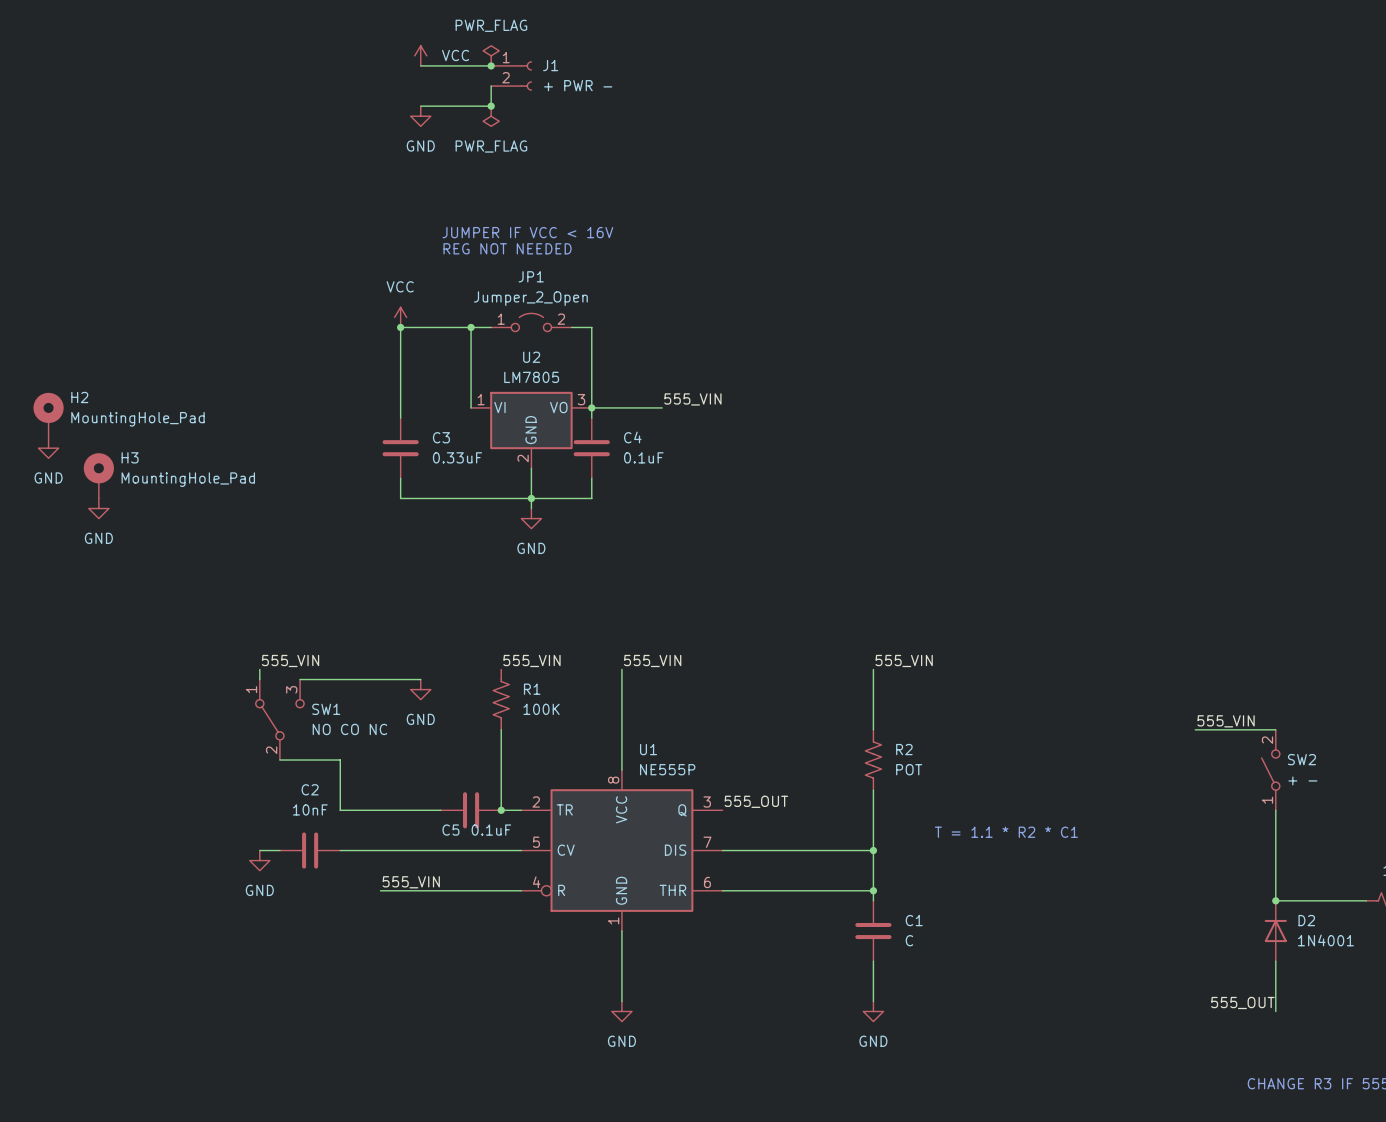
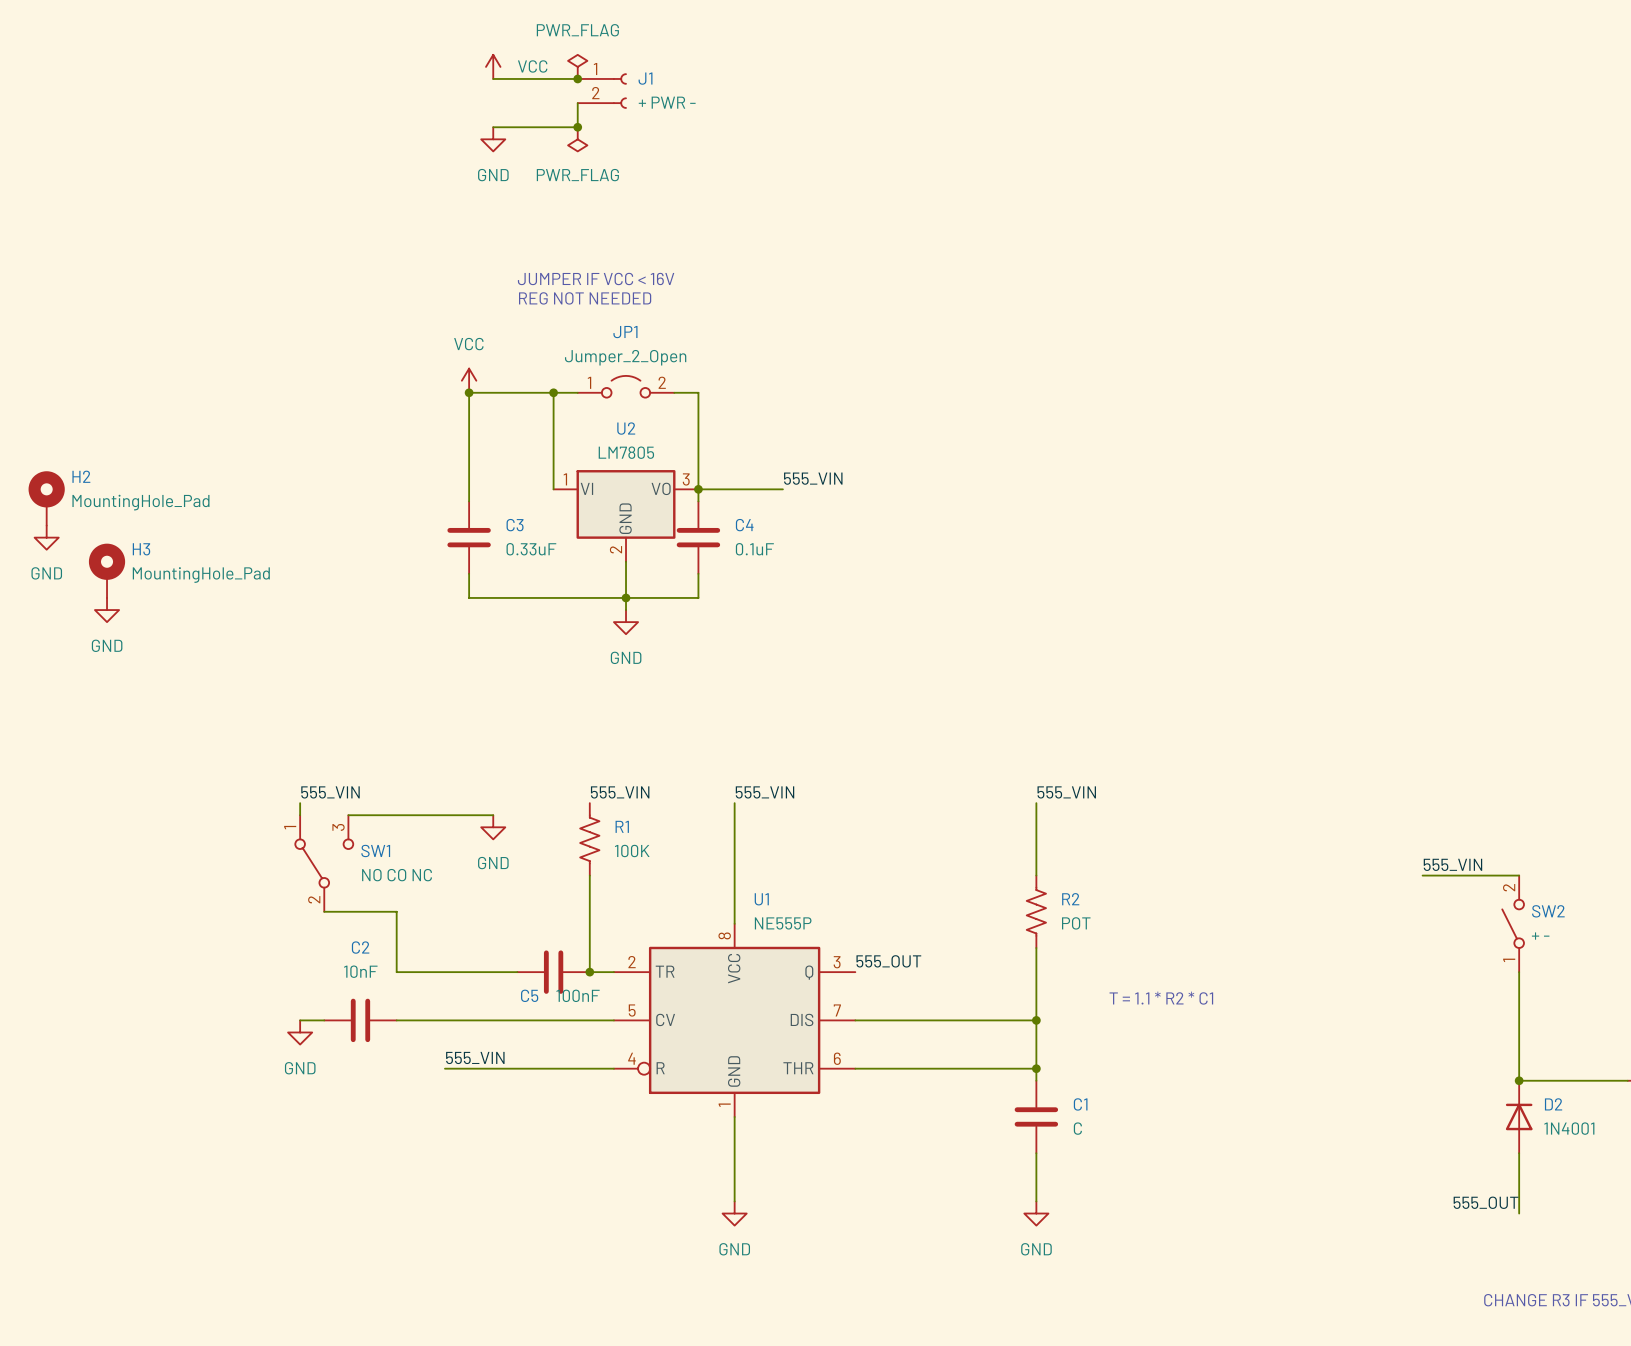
C5 value: 0.1uF (491, 830) -> 100nF (578, 995)

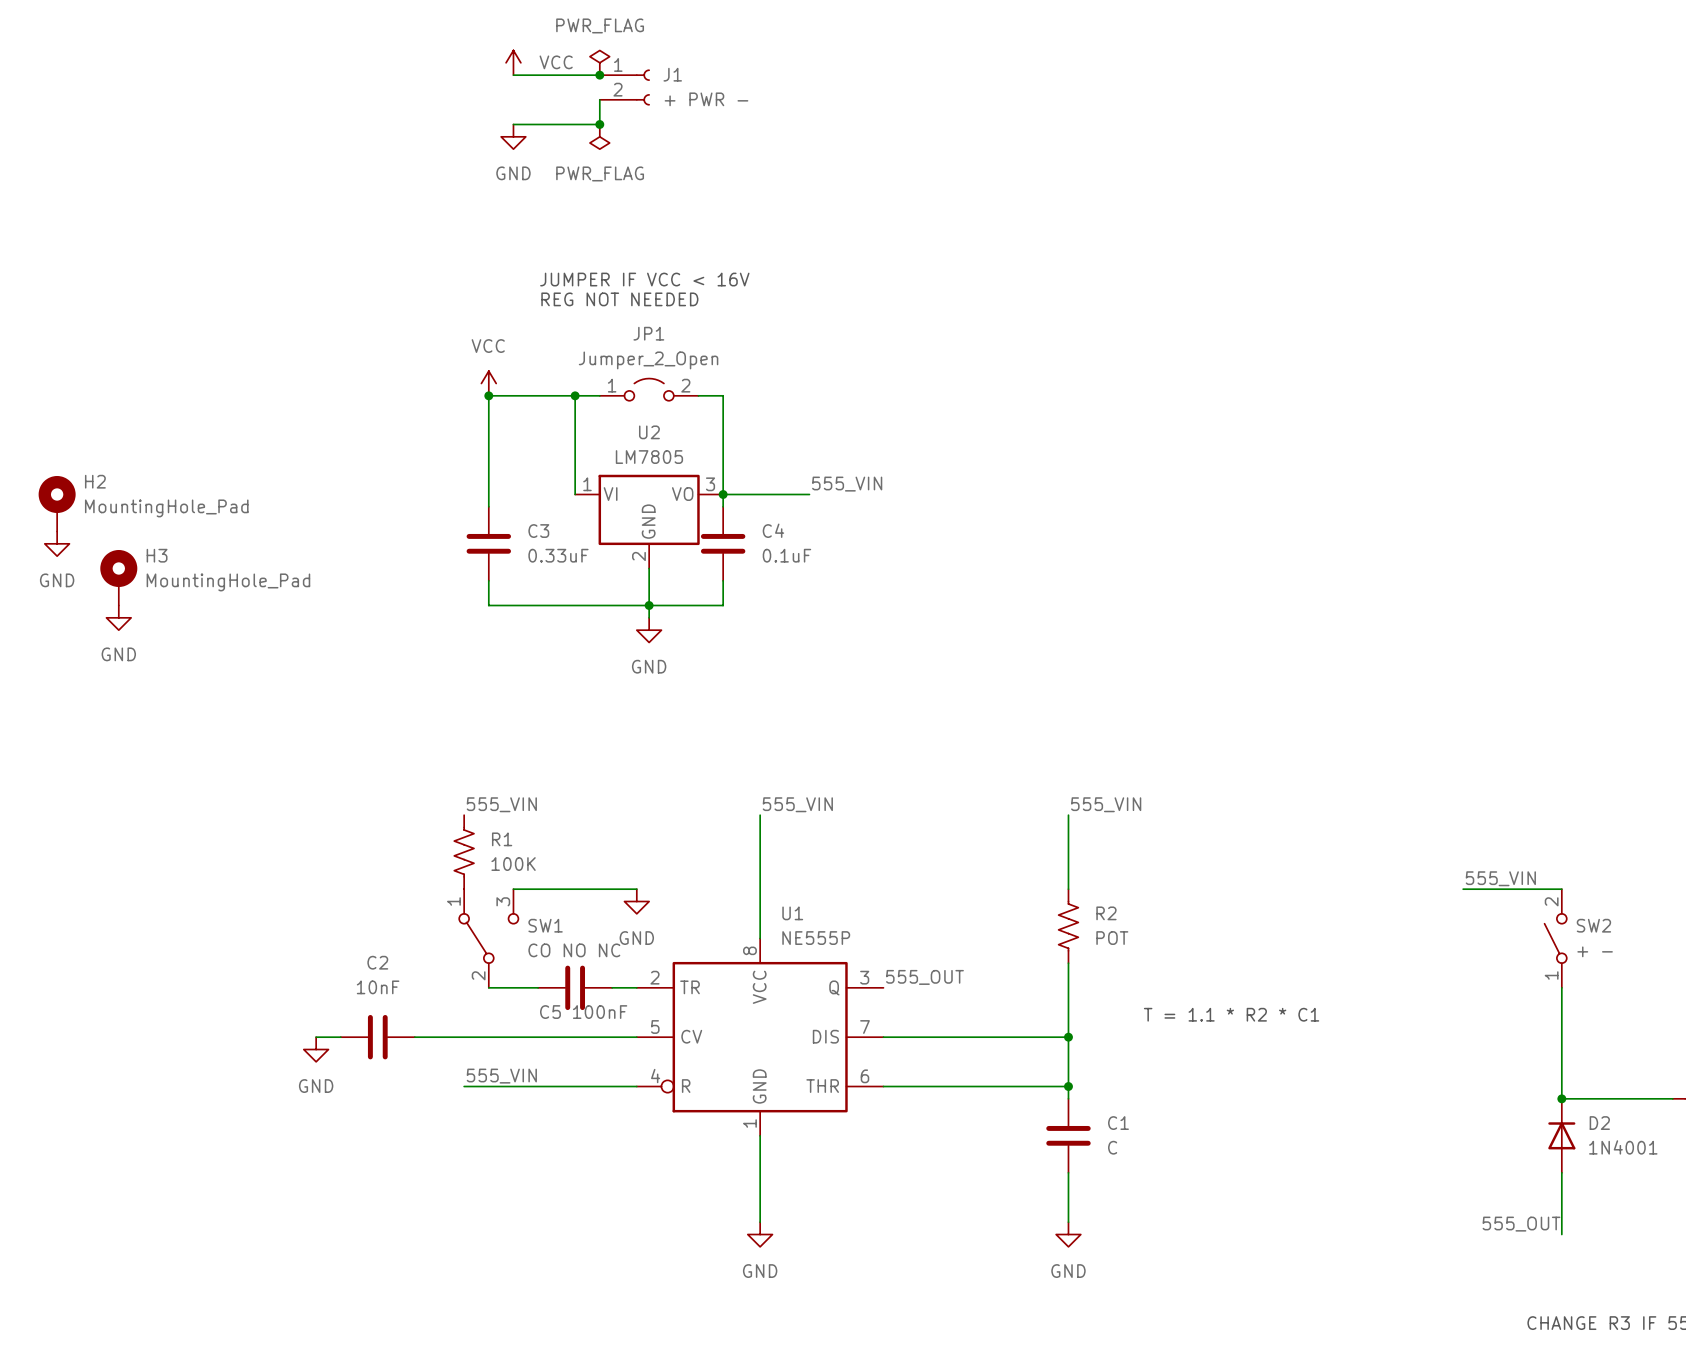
label: 555_VIN (330, 792) -> none
label: none -> 555_VIN (501, 804)
label: 555_VIN (620, 792) -> none
wire: (300, 803) (300, 815) -> none
wire: (348, 815) (493, 815) -> none
power symbol position: GND (493, 827) -> GND (636, 901)
R1 position: (589, 839) -> (464, 852)
SW1 position: (324, 863) -> (488, 938)
SW1 value: NO CO NC (397, 875) -> CO NO NC (574, 950)
wire: none -> (513, 889) (636, 889)
wire: (589, 875) (589, 972) -> none
wire: (324, 911) (396, 911) (396, 972) (469, 972) -> none
junction: (589, 972) -> none

